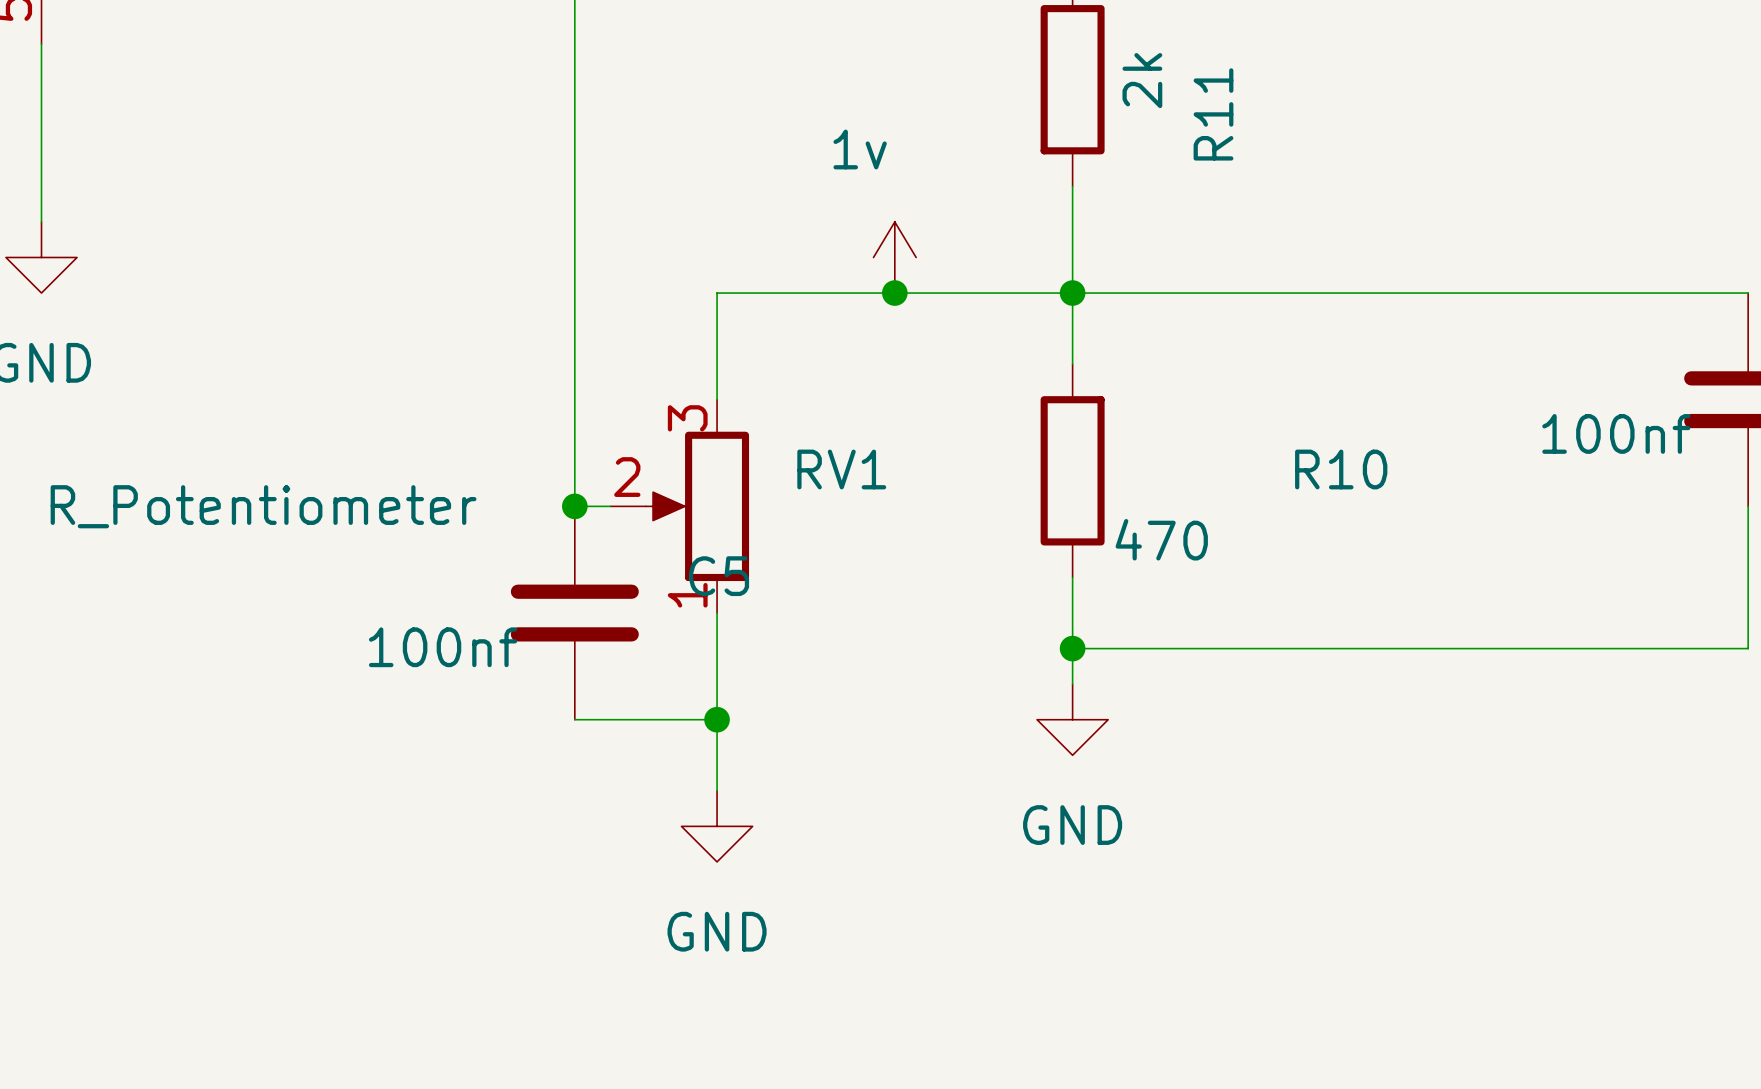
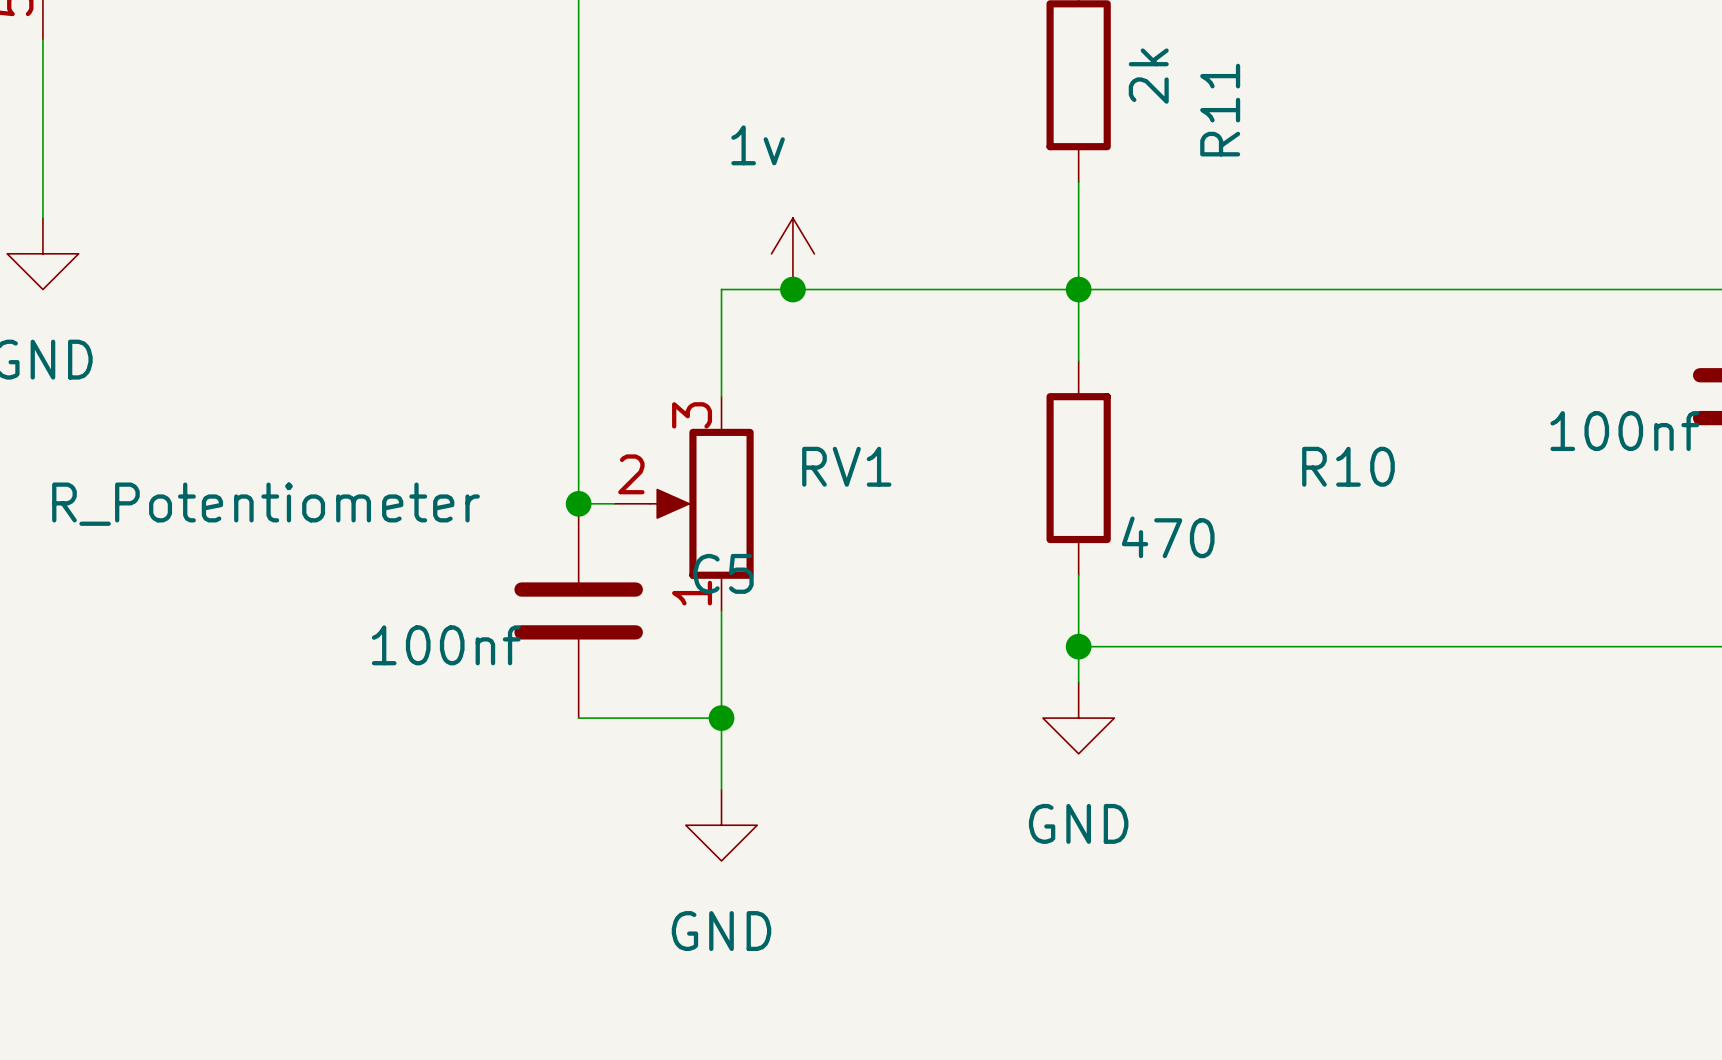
power symbol position: 1v (894, 257) -> 1v (792, 253)
junction position: (894, 293) -> (792, 289)

